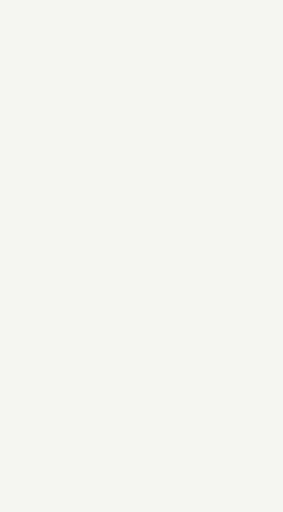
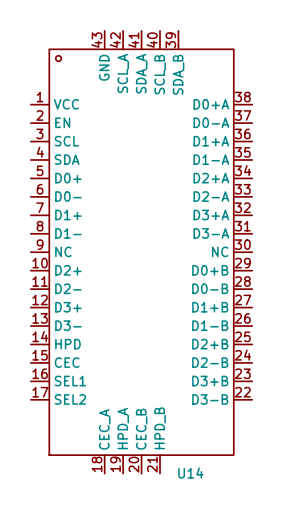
U14: none -> (141, 252)

